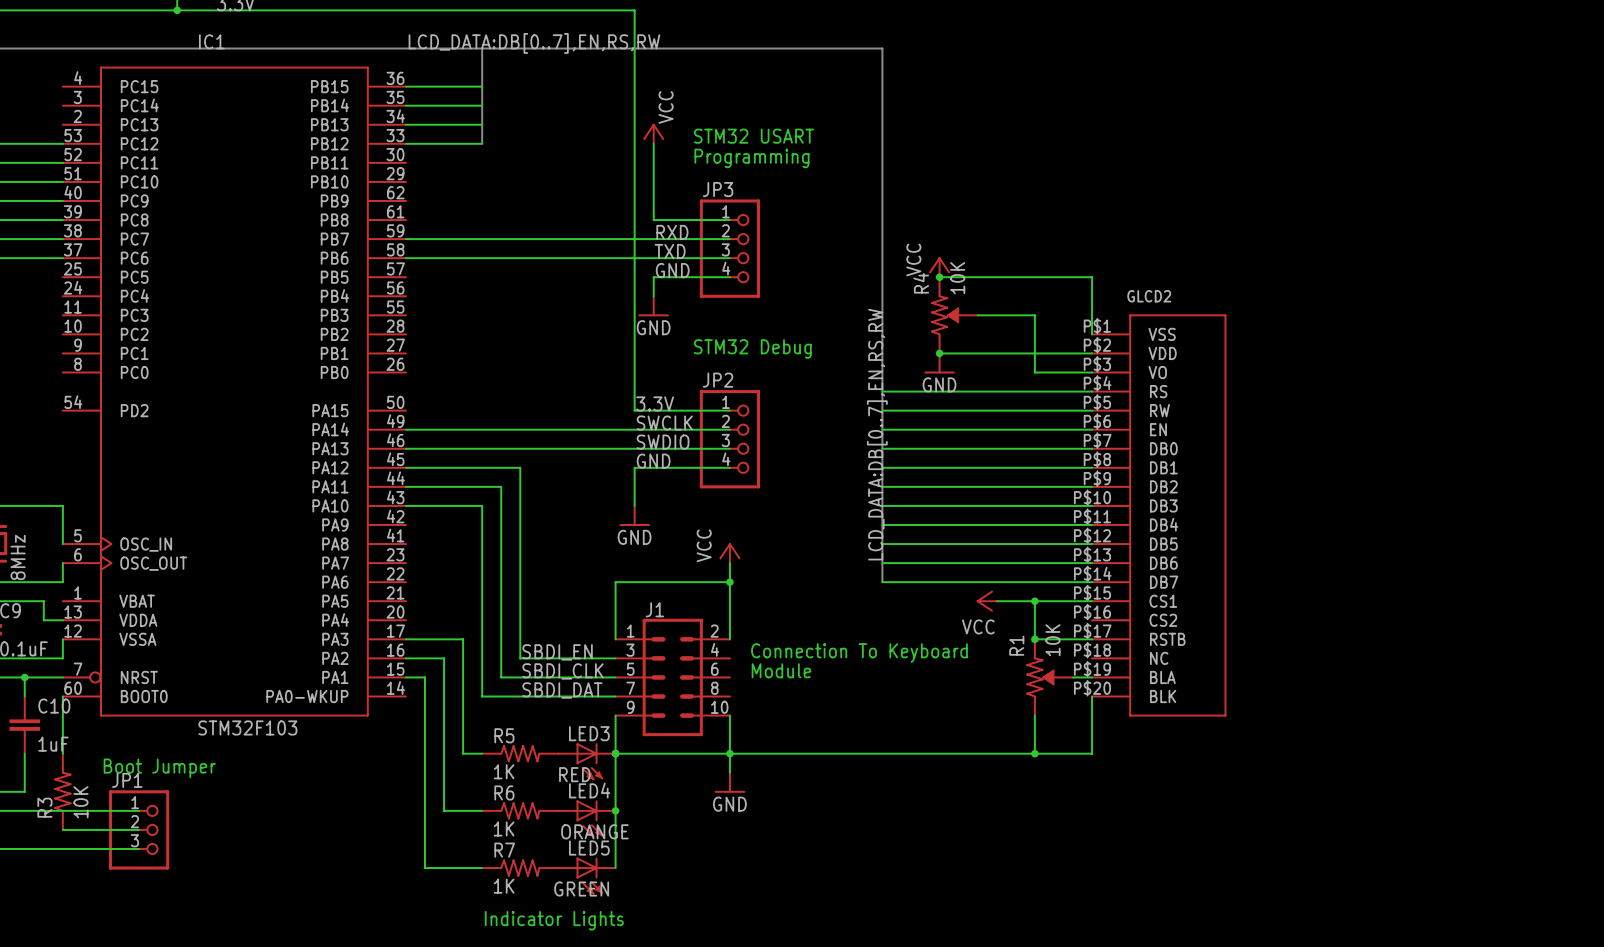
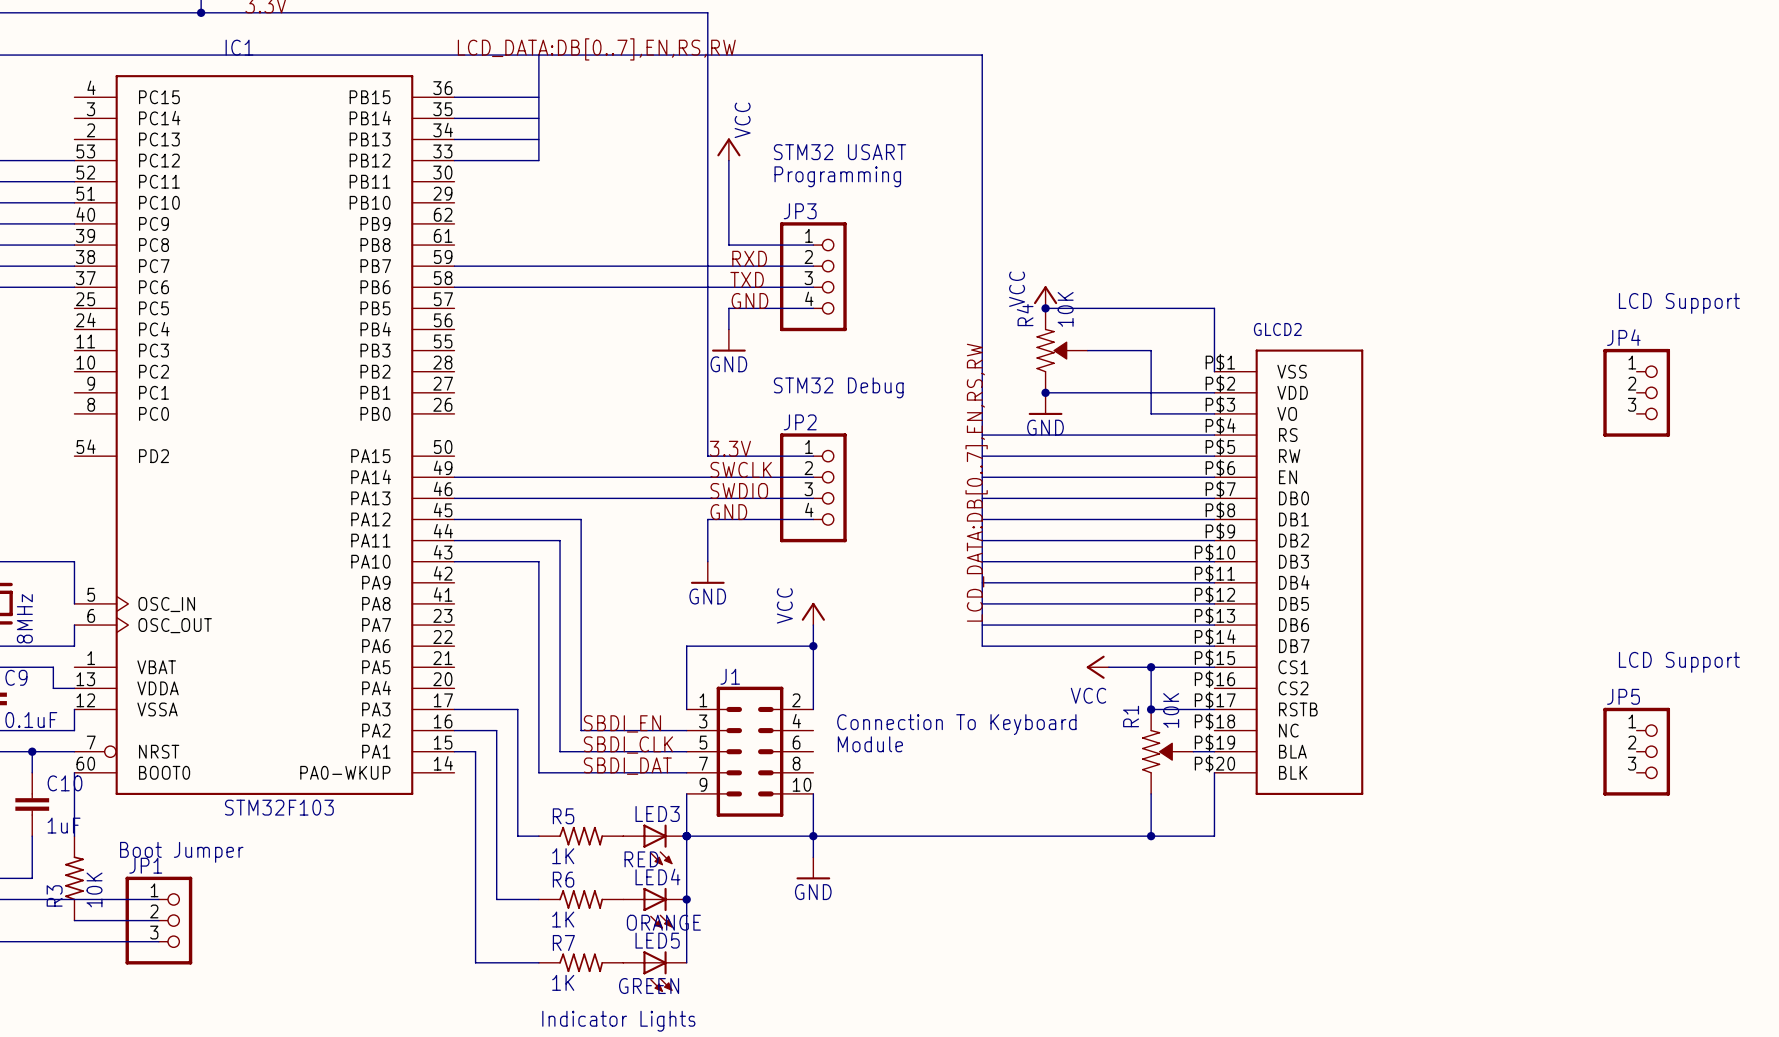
text: none -> LCD Support (1679, 303)
JP4: none -> (1636, 392)
text: none -> LCD Support (1679, 662)
JP5: none -> (1636, 751)

